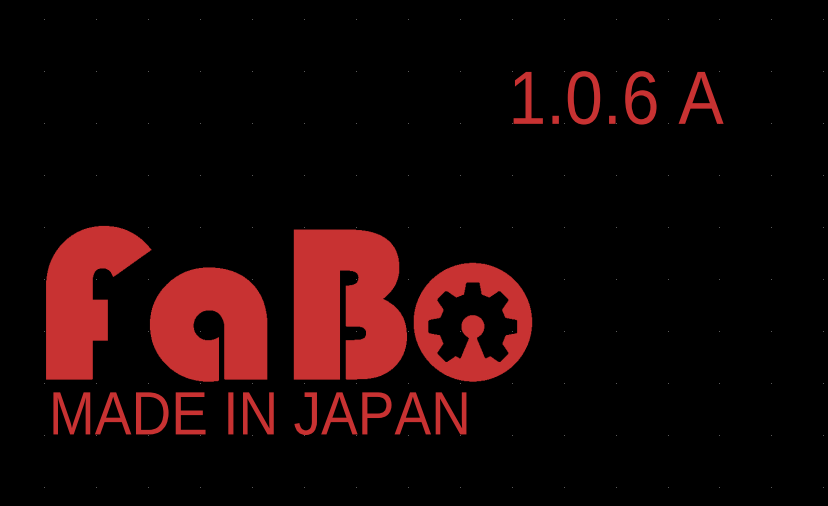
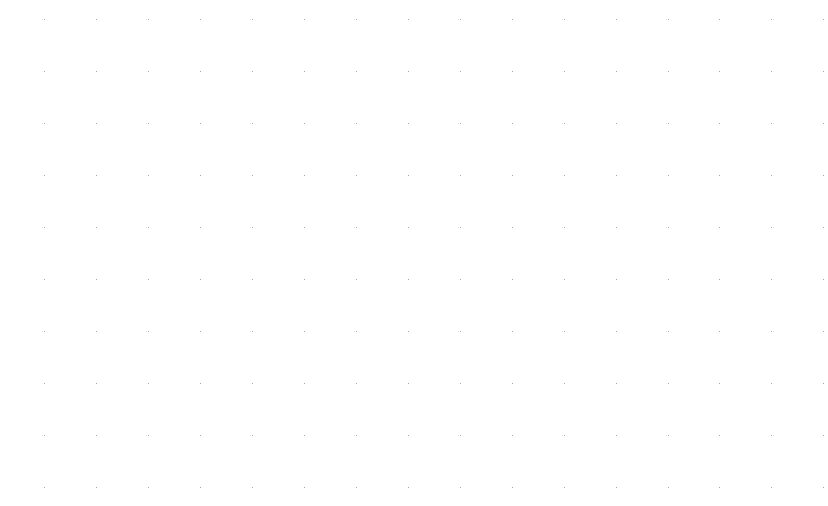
text: 1.0.6 A (618, 97) -> none
part: (289, 303) -> none

